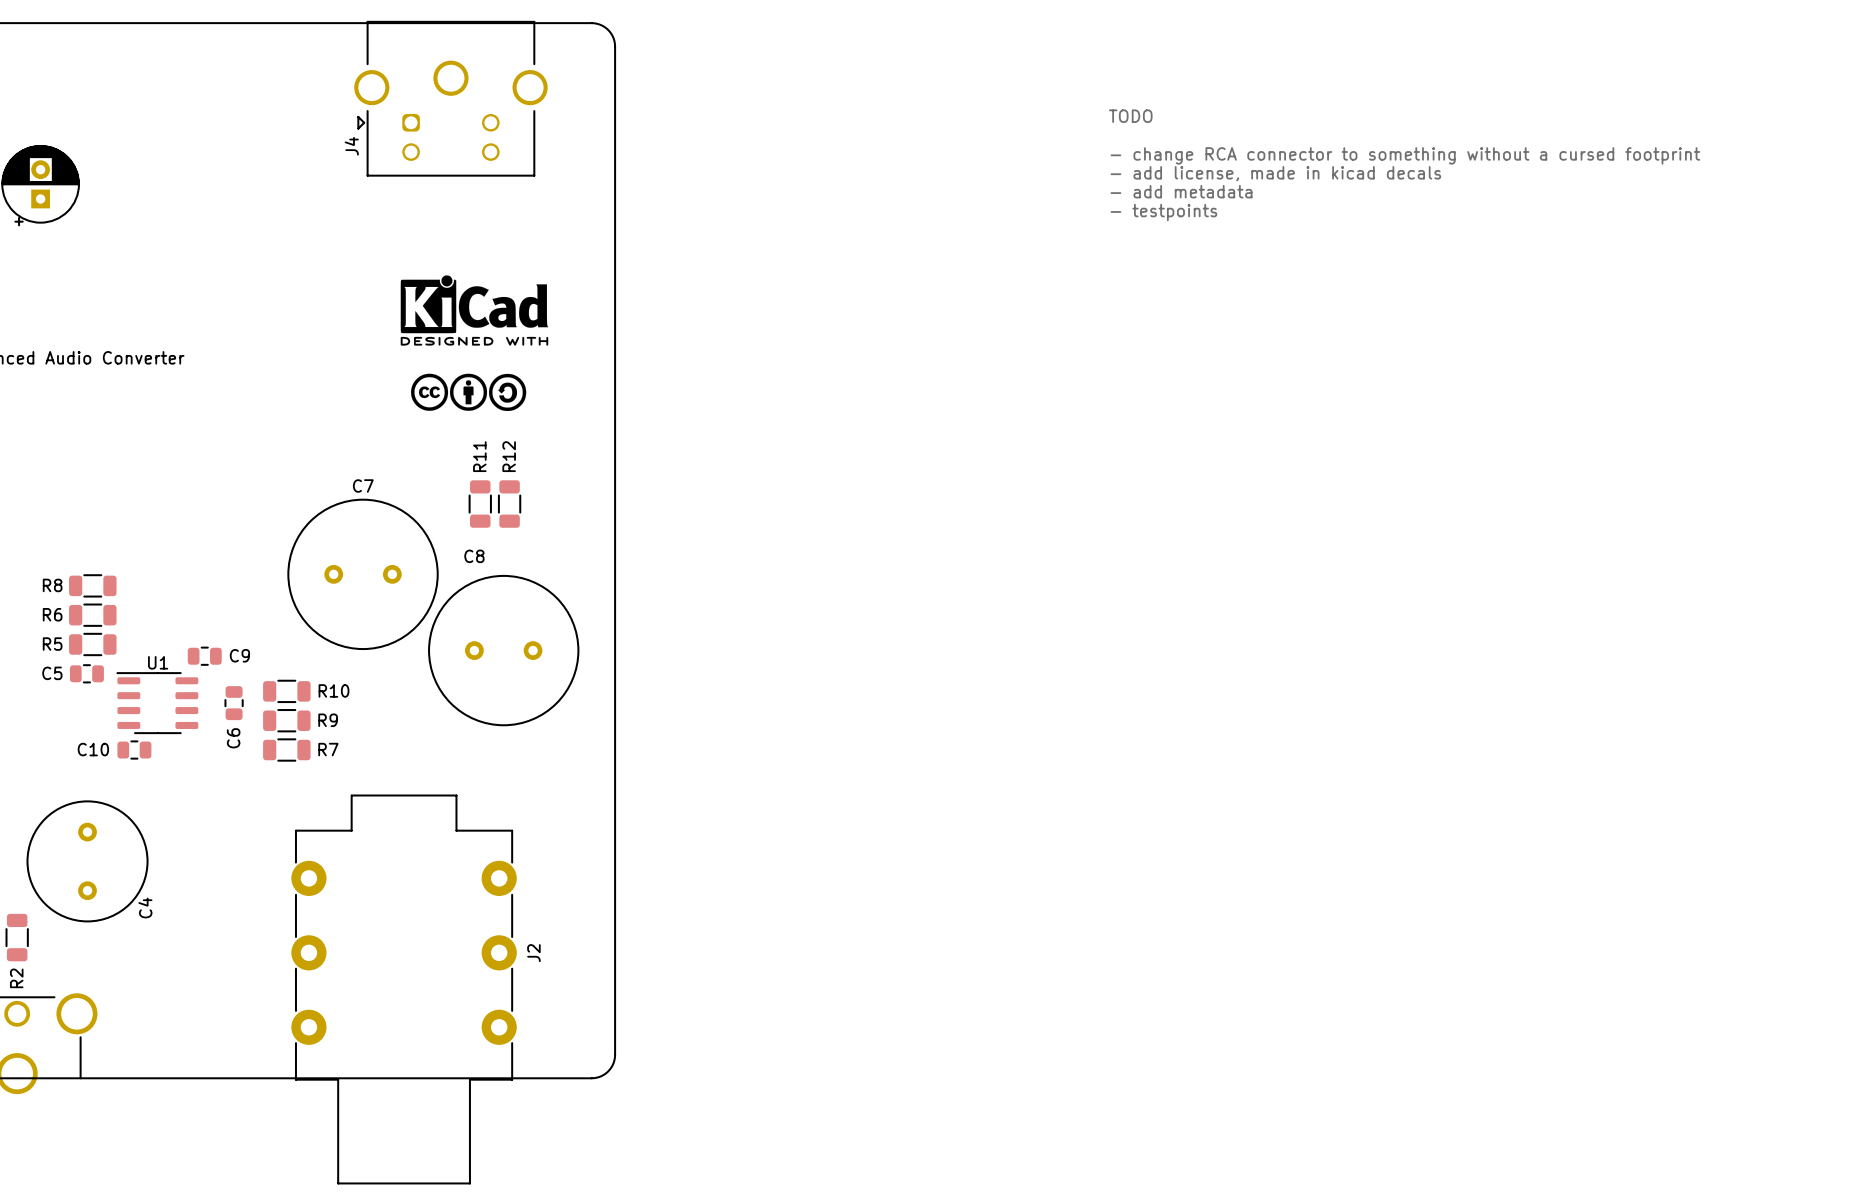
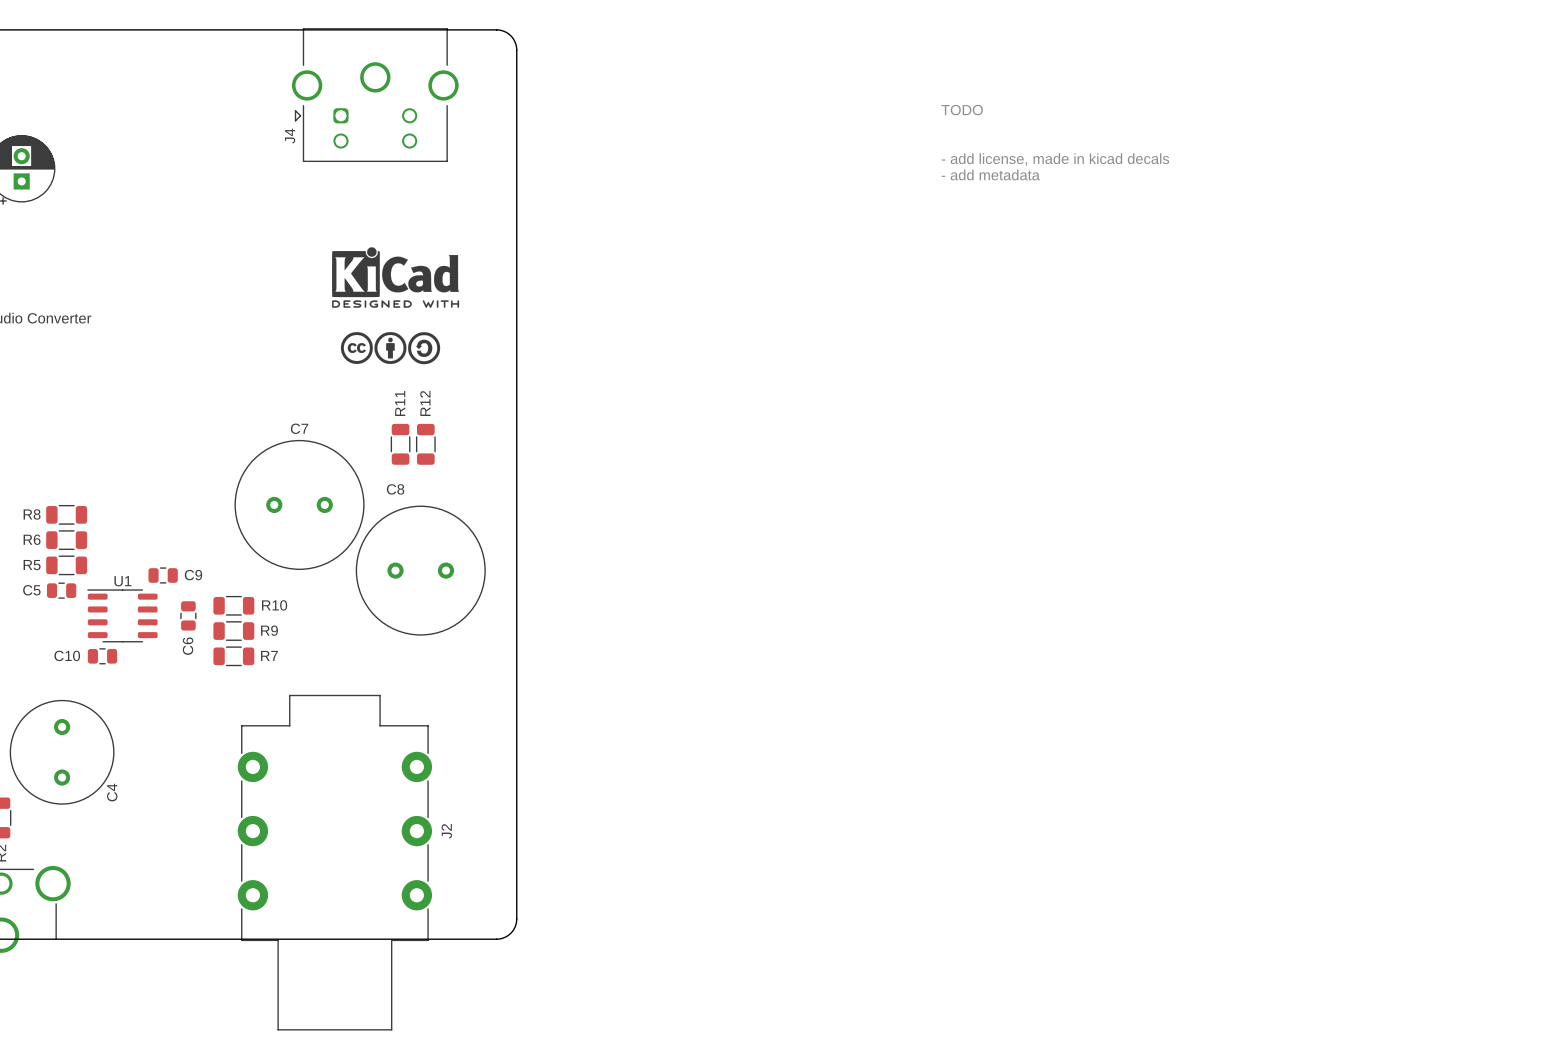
text: - change RCA connector to something without a cursed footprint (1405, 155) -> none
text: - testpoints (1163, 212) -> none

